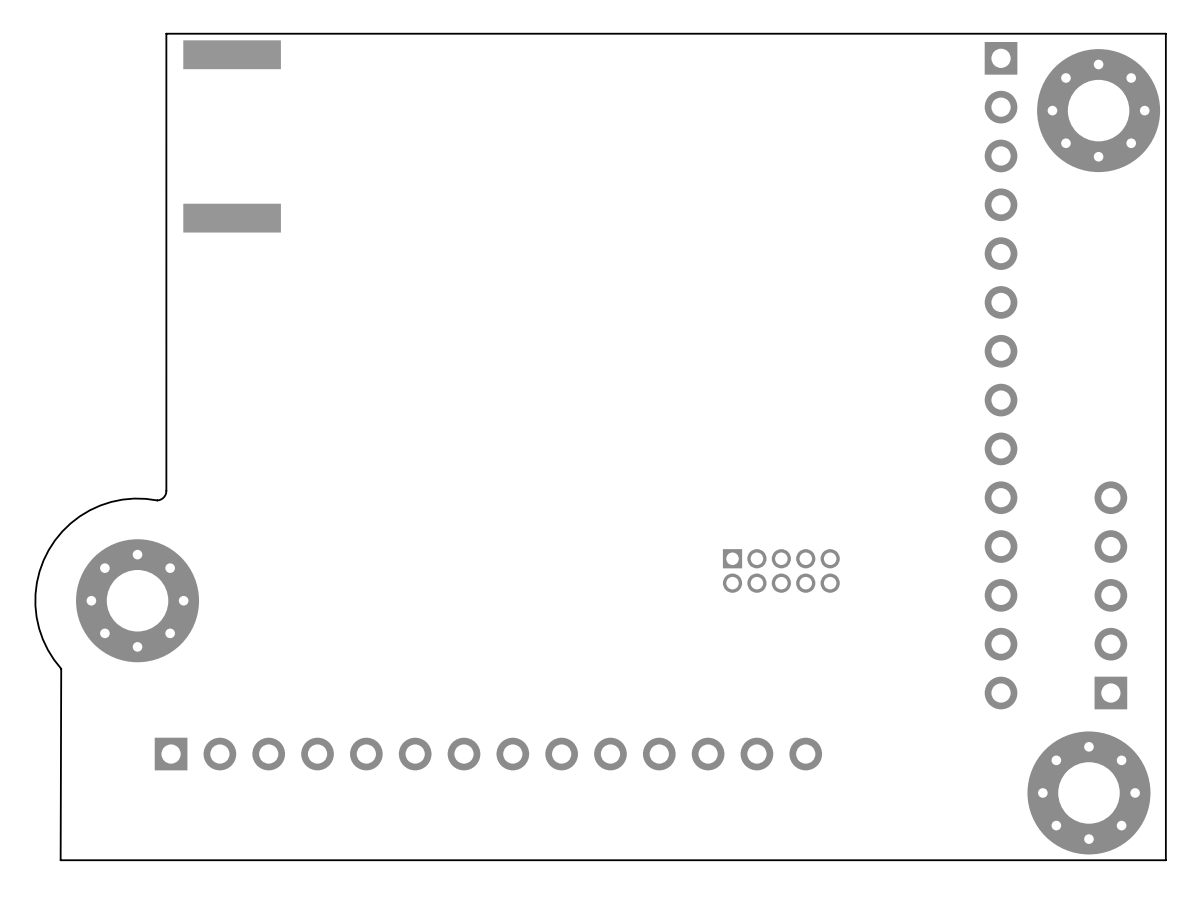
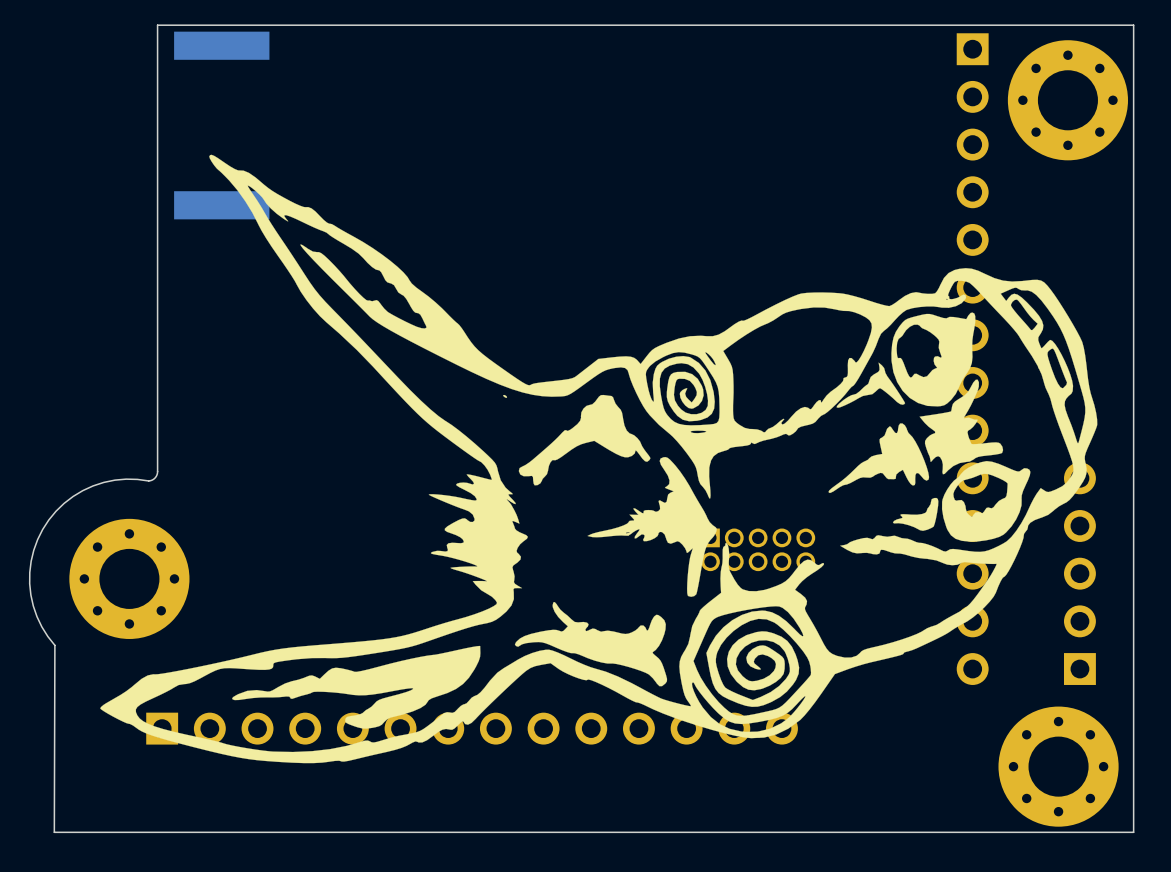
drawing: none -> [100, 154, 1098, 764]

